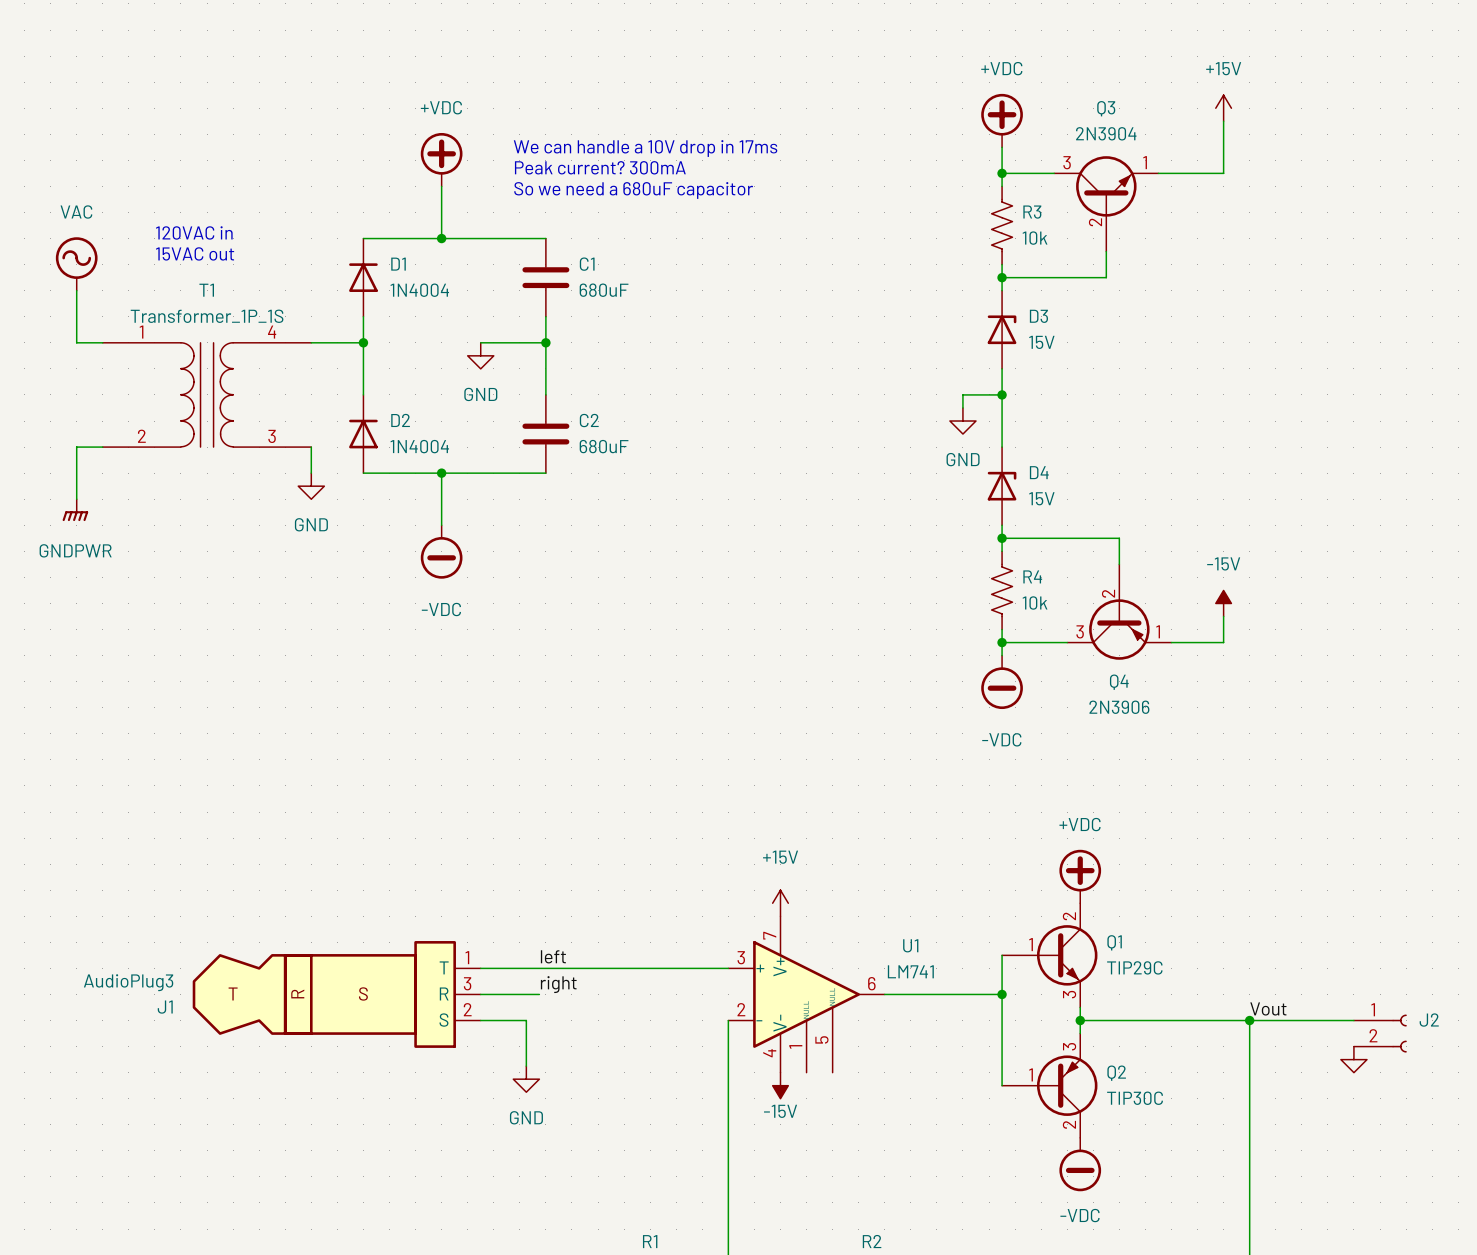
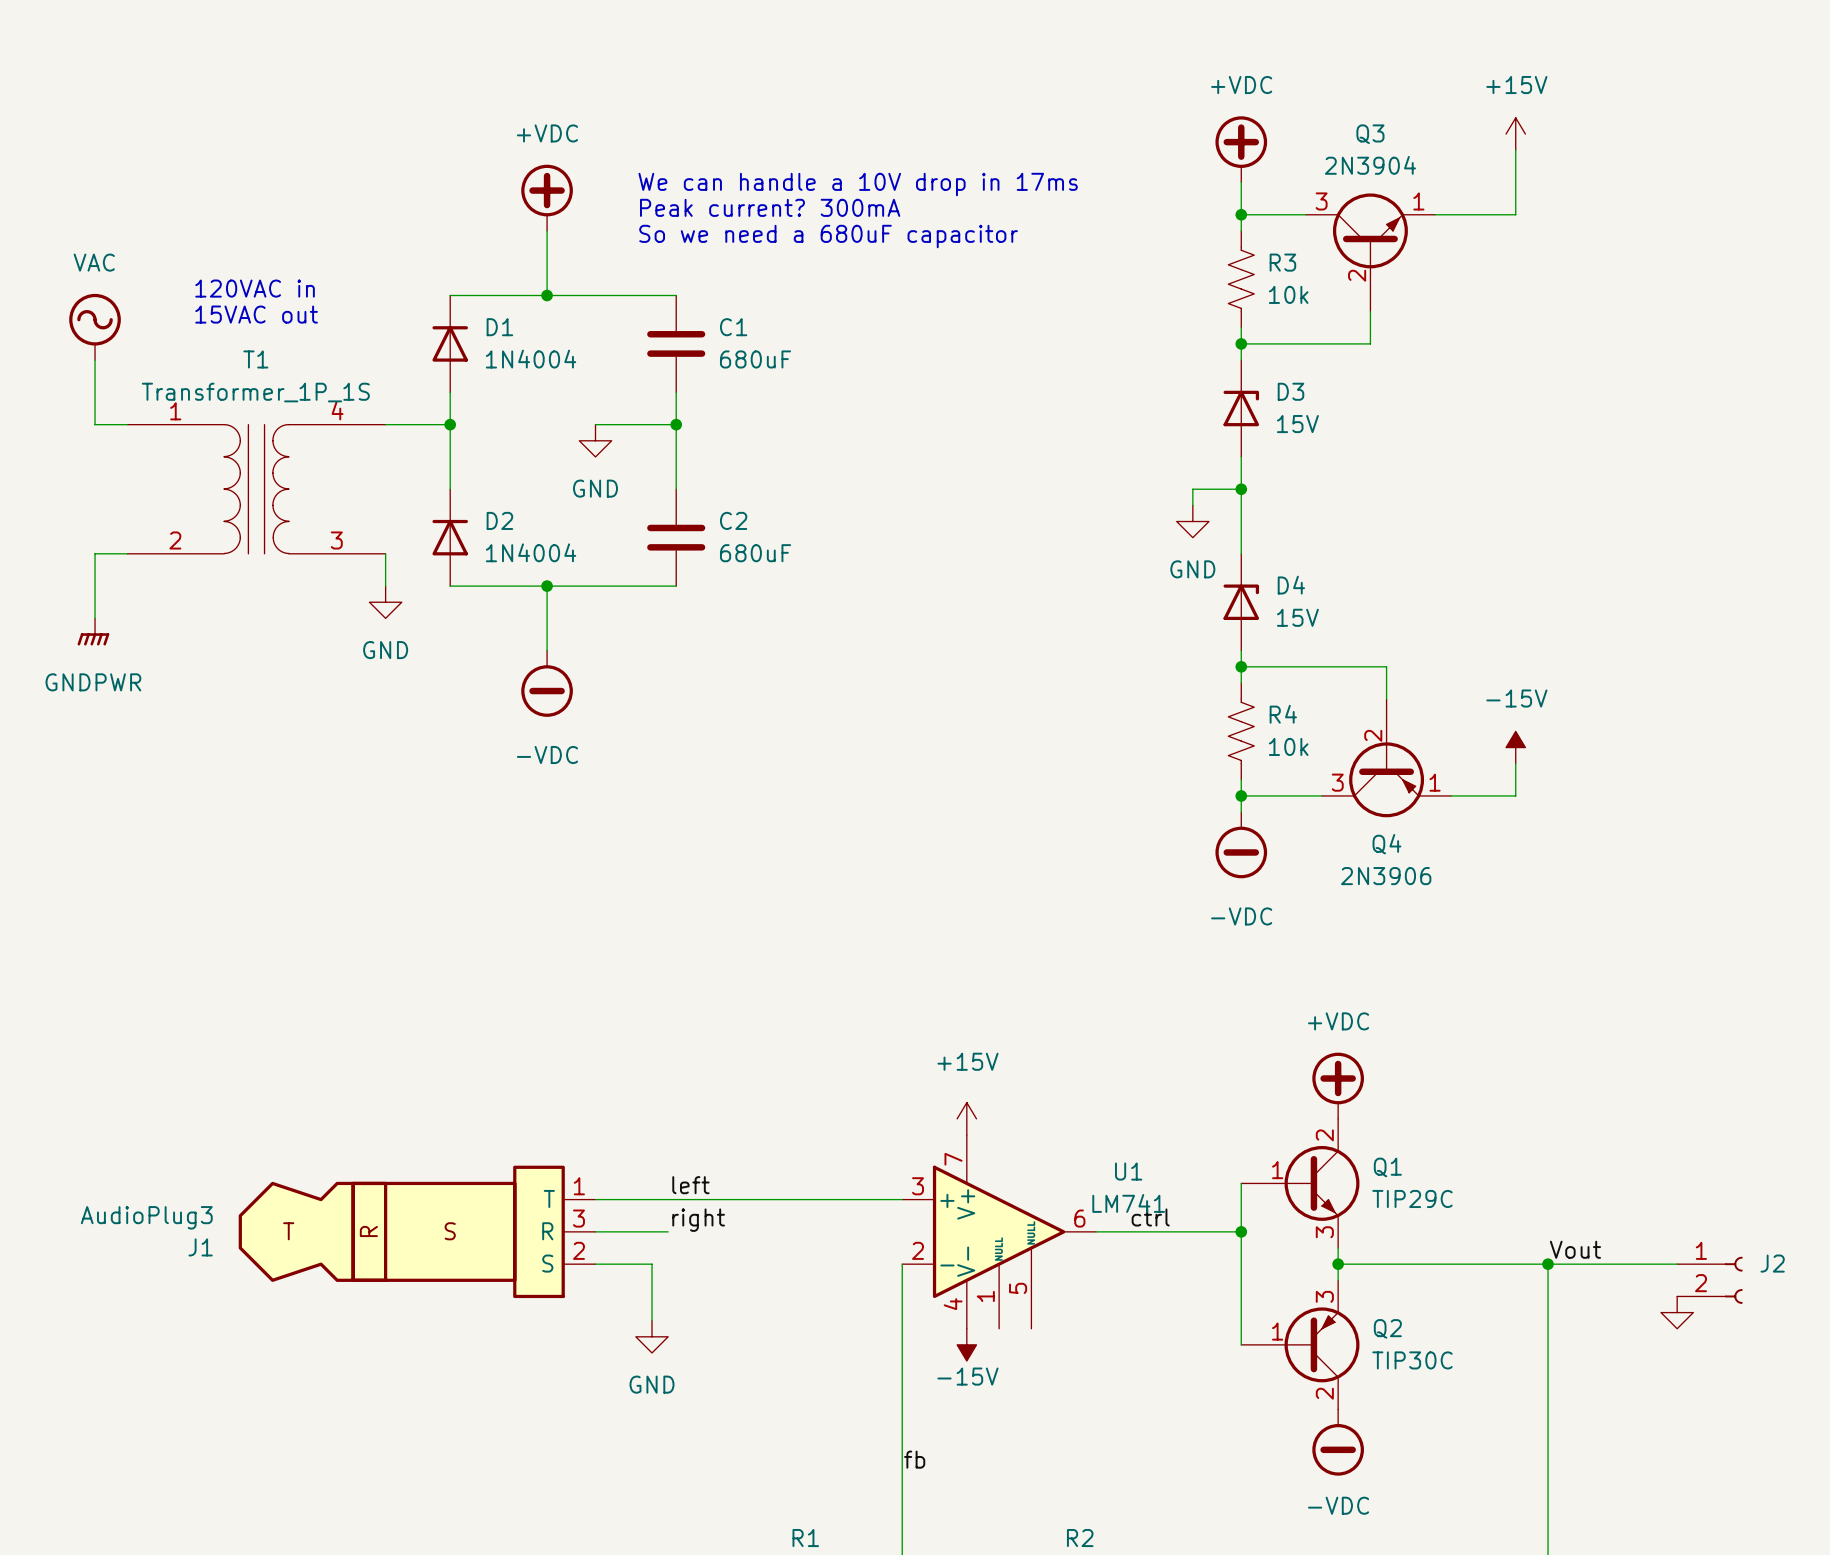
label: none -> ctrl (1150, 1217)
label: none -> fb (914, 1459)

